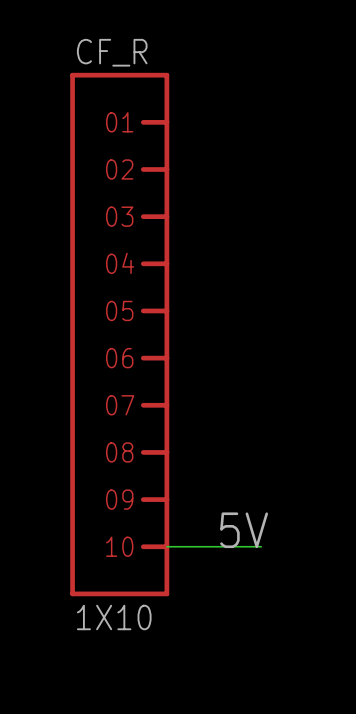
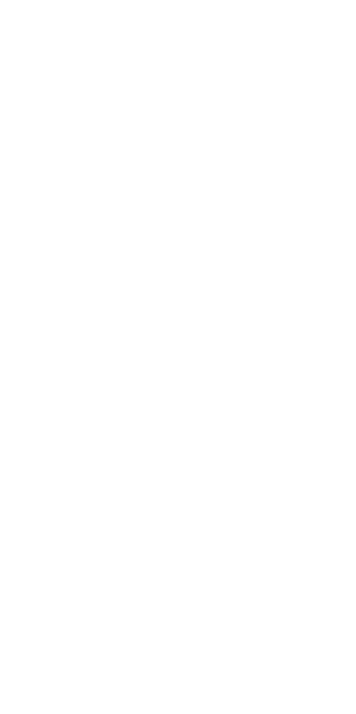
CF_R: 1X10 (119, 334) -> none
label: 5V (244, 530) -> none
wire: (166, 546) (261, 546) -> none

